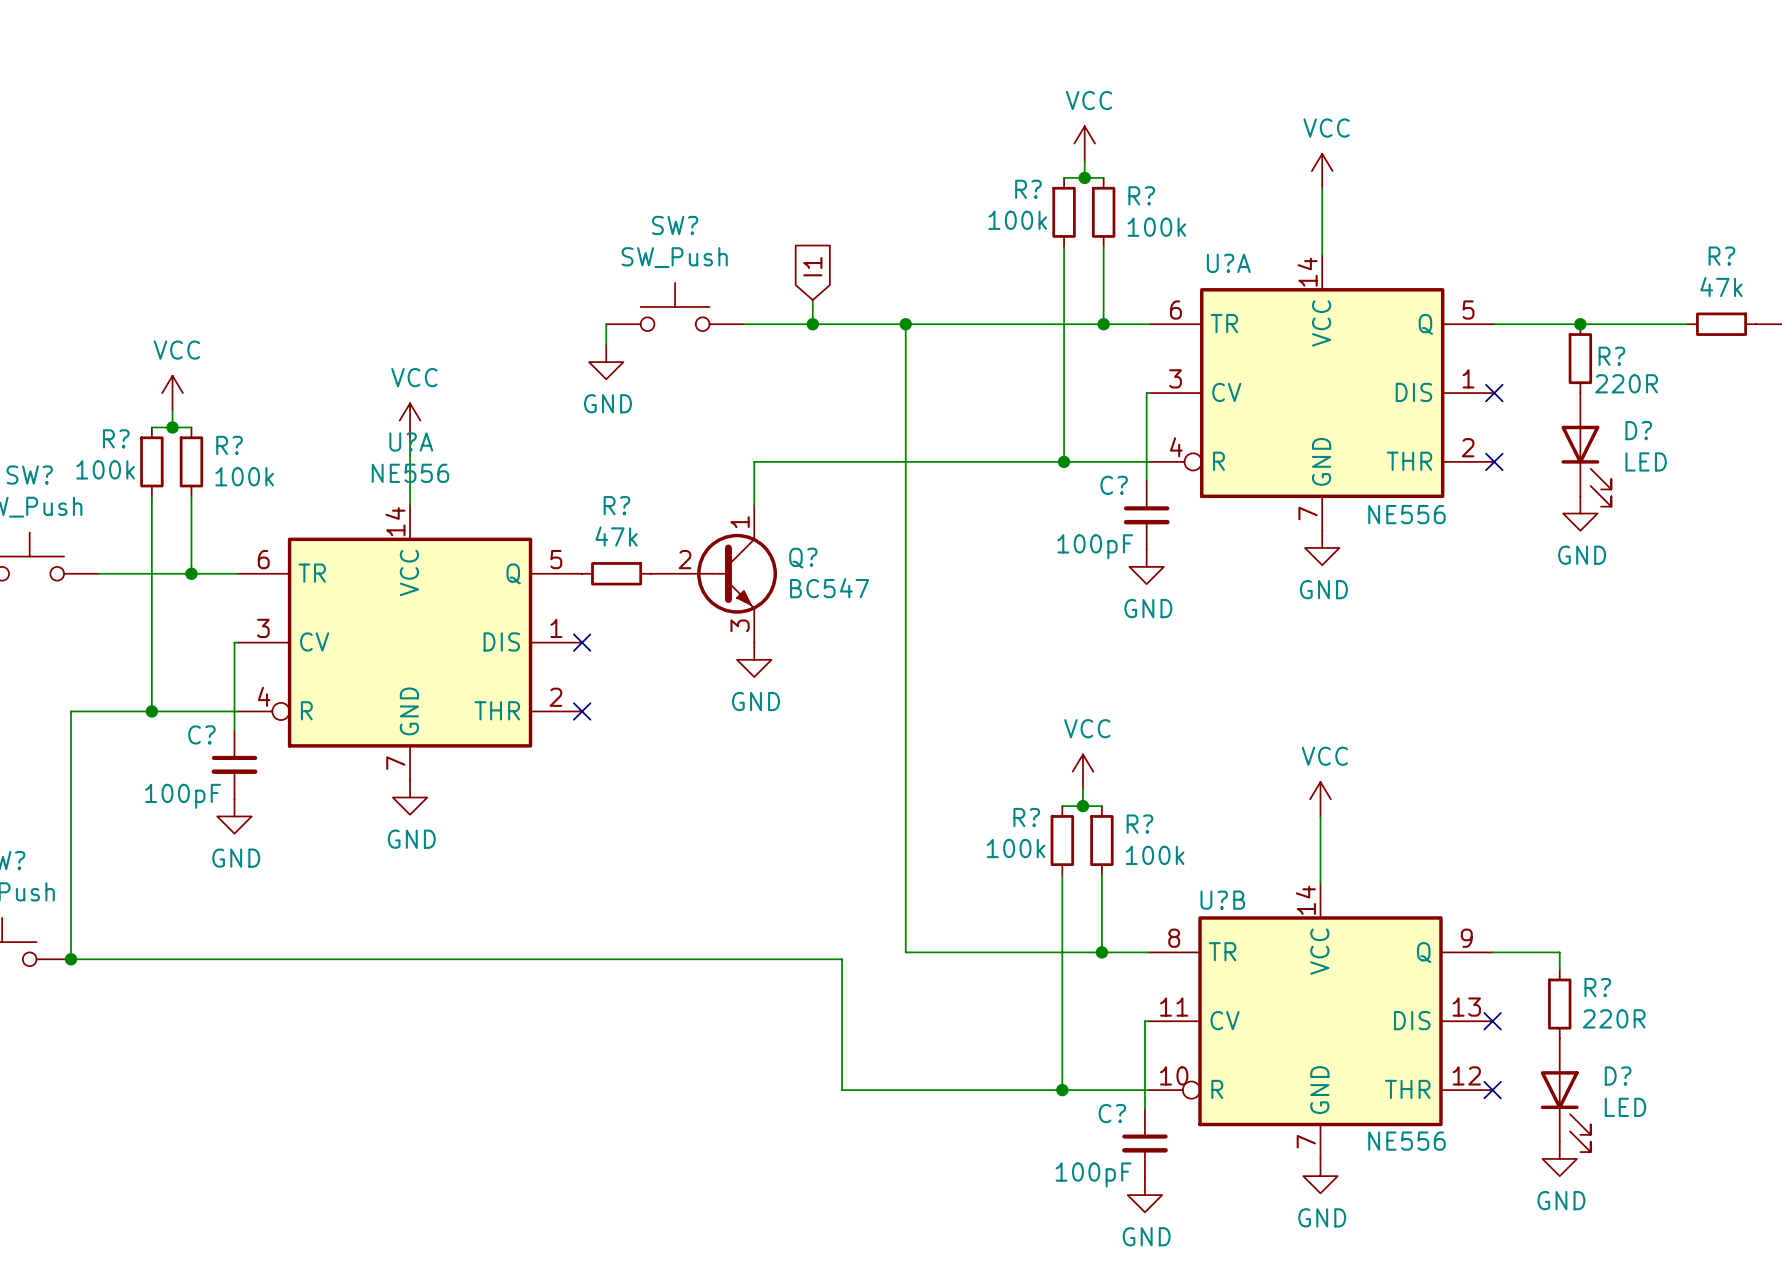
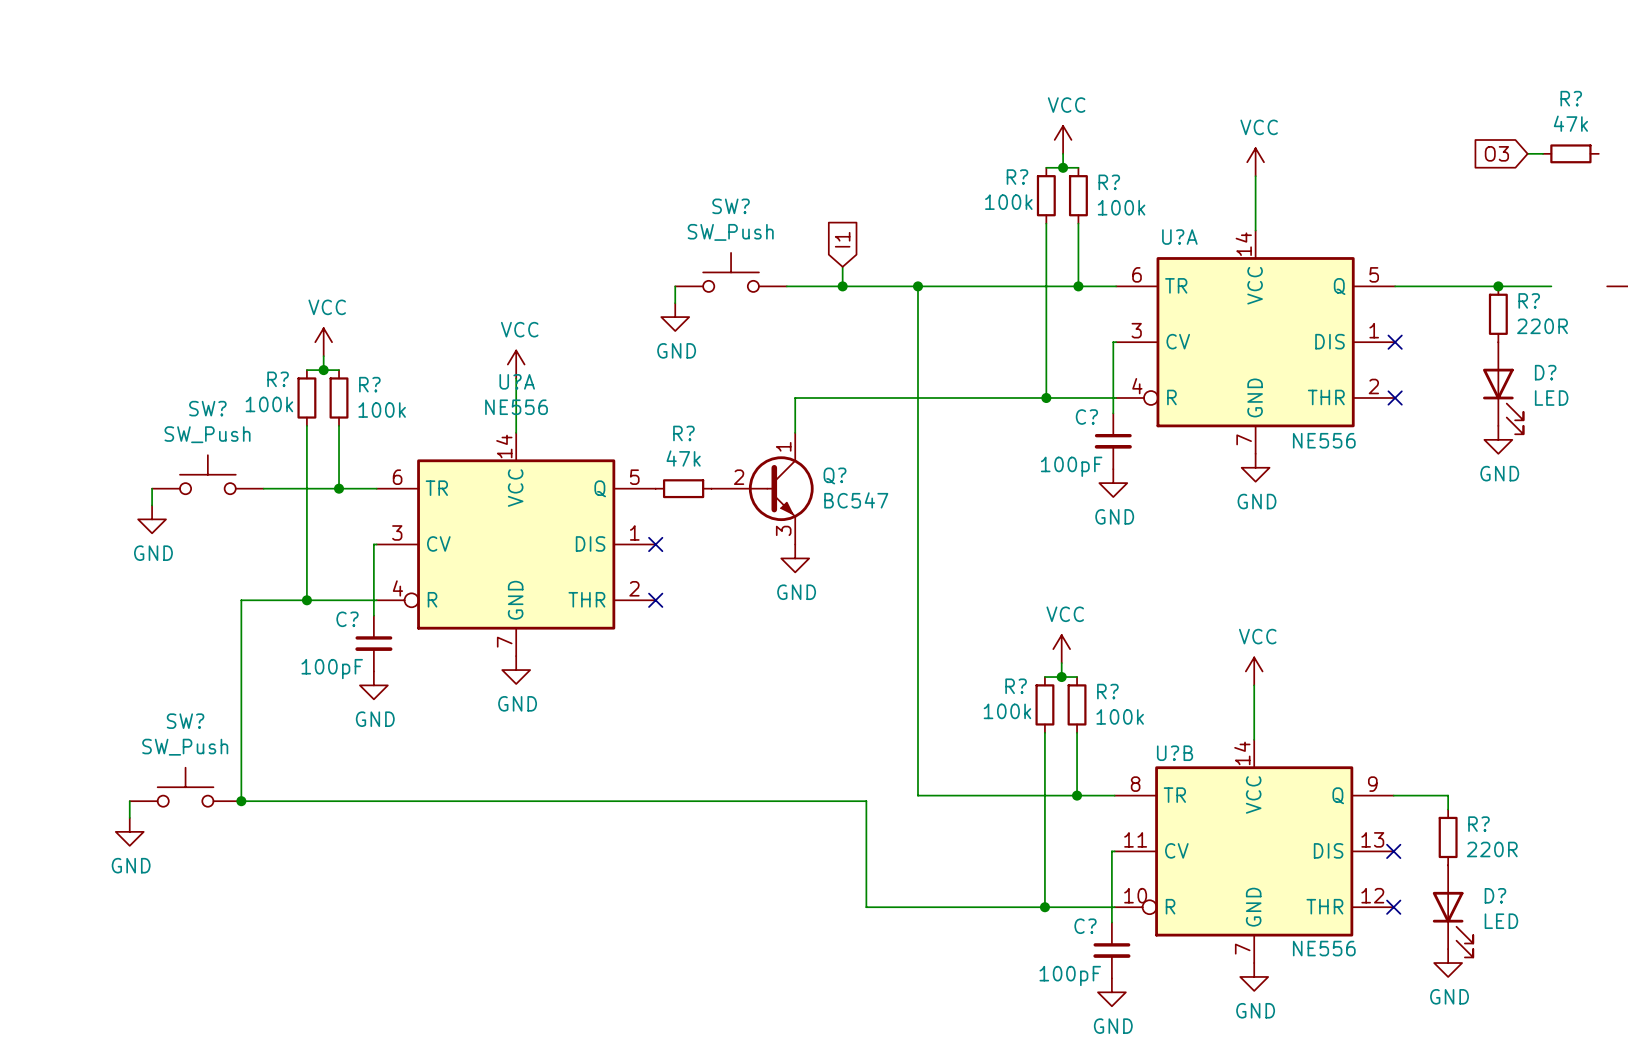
global label: none -> O3 (1496, 153)
wire: none -> (1527, 153) (1543, 153)
R?: none -> 47k (1570, 153)
junction position: (1580, 324) -> (1498, 286)
R?: 47k (1721, 324) -> none
R? name position: R? (1611, 356) -> R? (1529, 300)
R? position: (1580, 358) -> (1498, 314)
R? value position: 220R (1626, 383) -> 220R (1542, 326)
D? position: (1586, 449) -> (1503, 388)
power symbol position: GND (1580, 513) -> GND (1498, 439)

